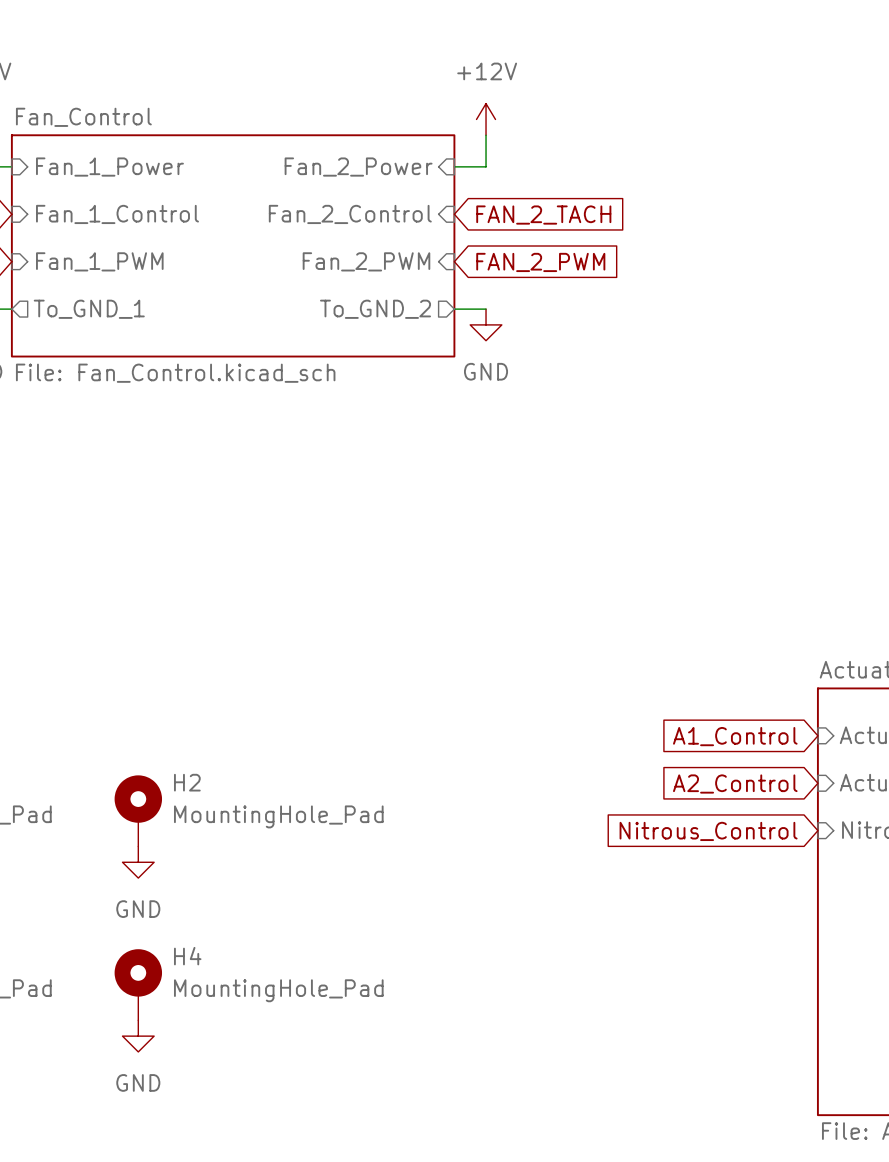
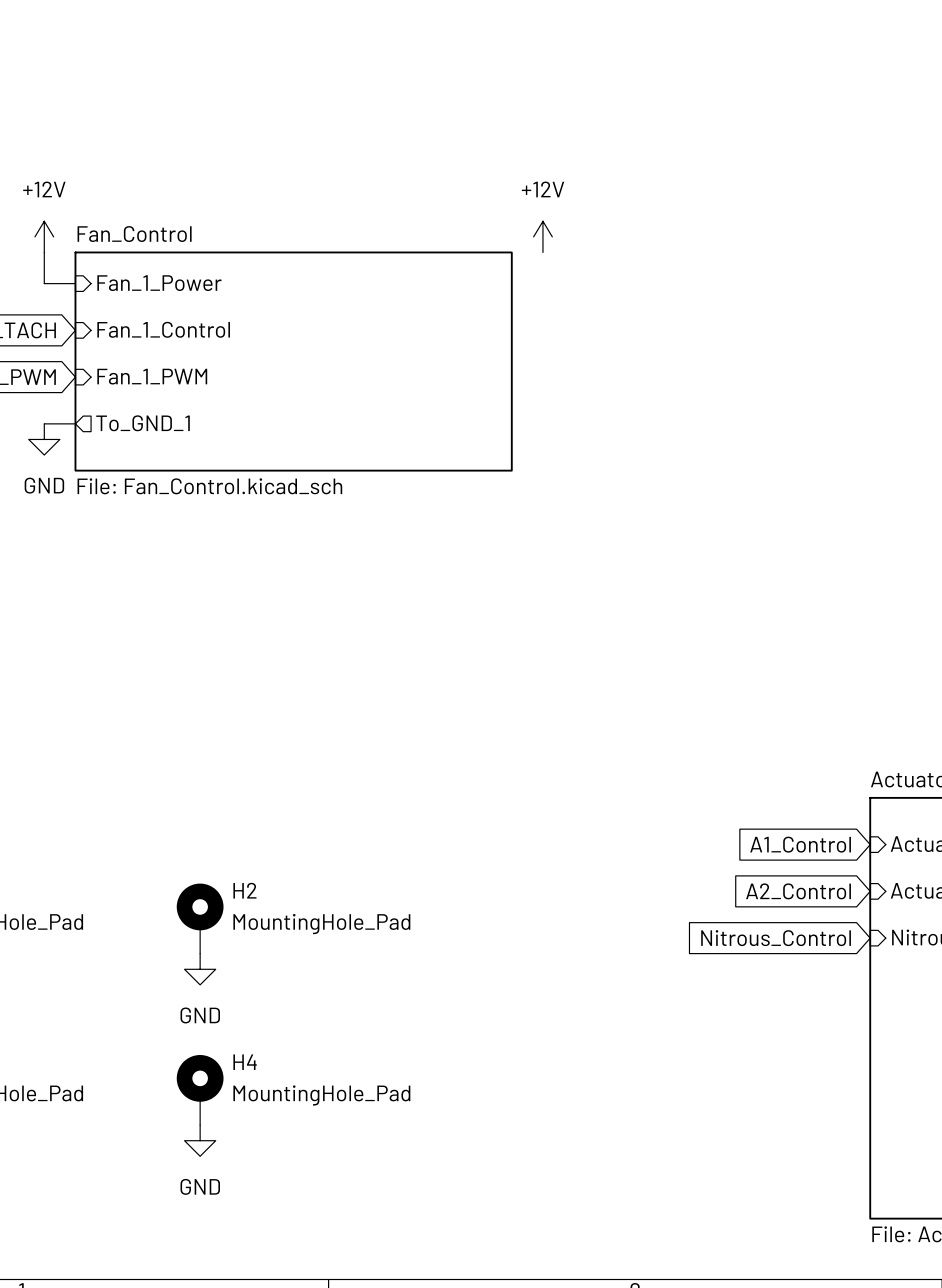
wire: (486, 135) (486, 166) (454, 166) -> none
sheet pin: Fan_2_Power (358, 167) -> none
sheet pin: Fan_2_Control (350, 214) -> none
global label: FAN_2_TACH (543, 215) -> none
sheet pin: Fan_2_PWM (366, 261) -> none
global label: FAN_2_PWM (540, 262) -> none
sheet pin: To_GND_2 (375, 309) -> none
wire: (454, 309) (486, 309) -> none
power symbol: GND (486, 324) -> none

